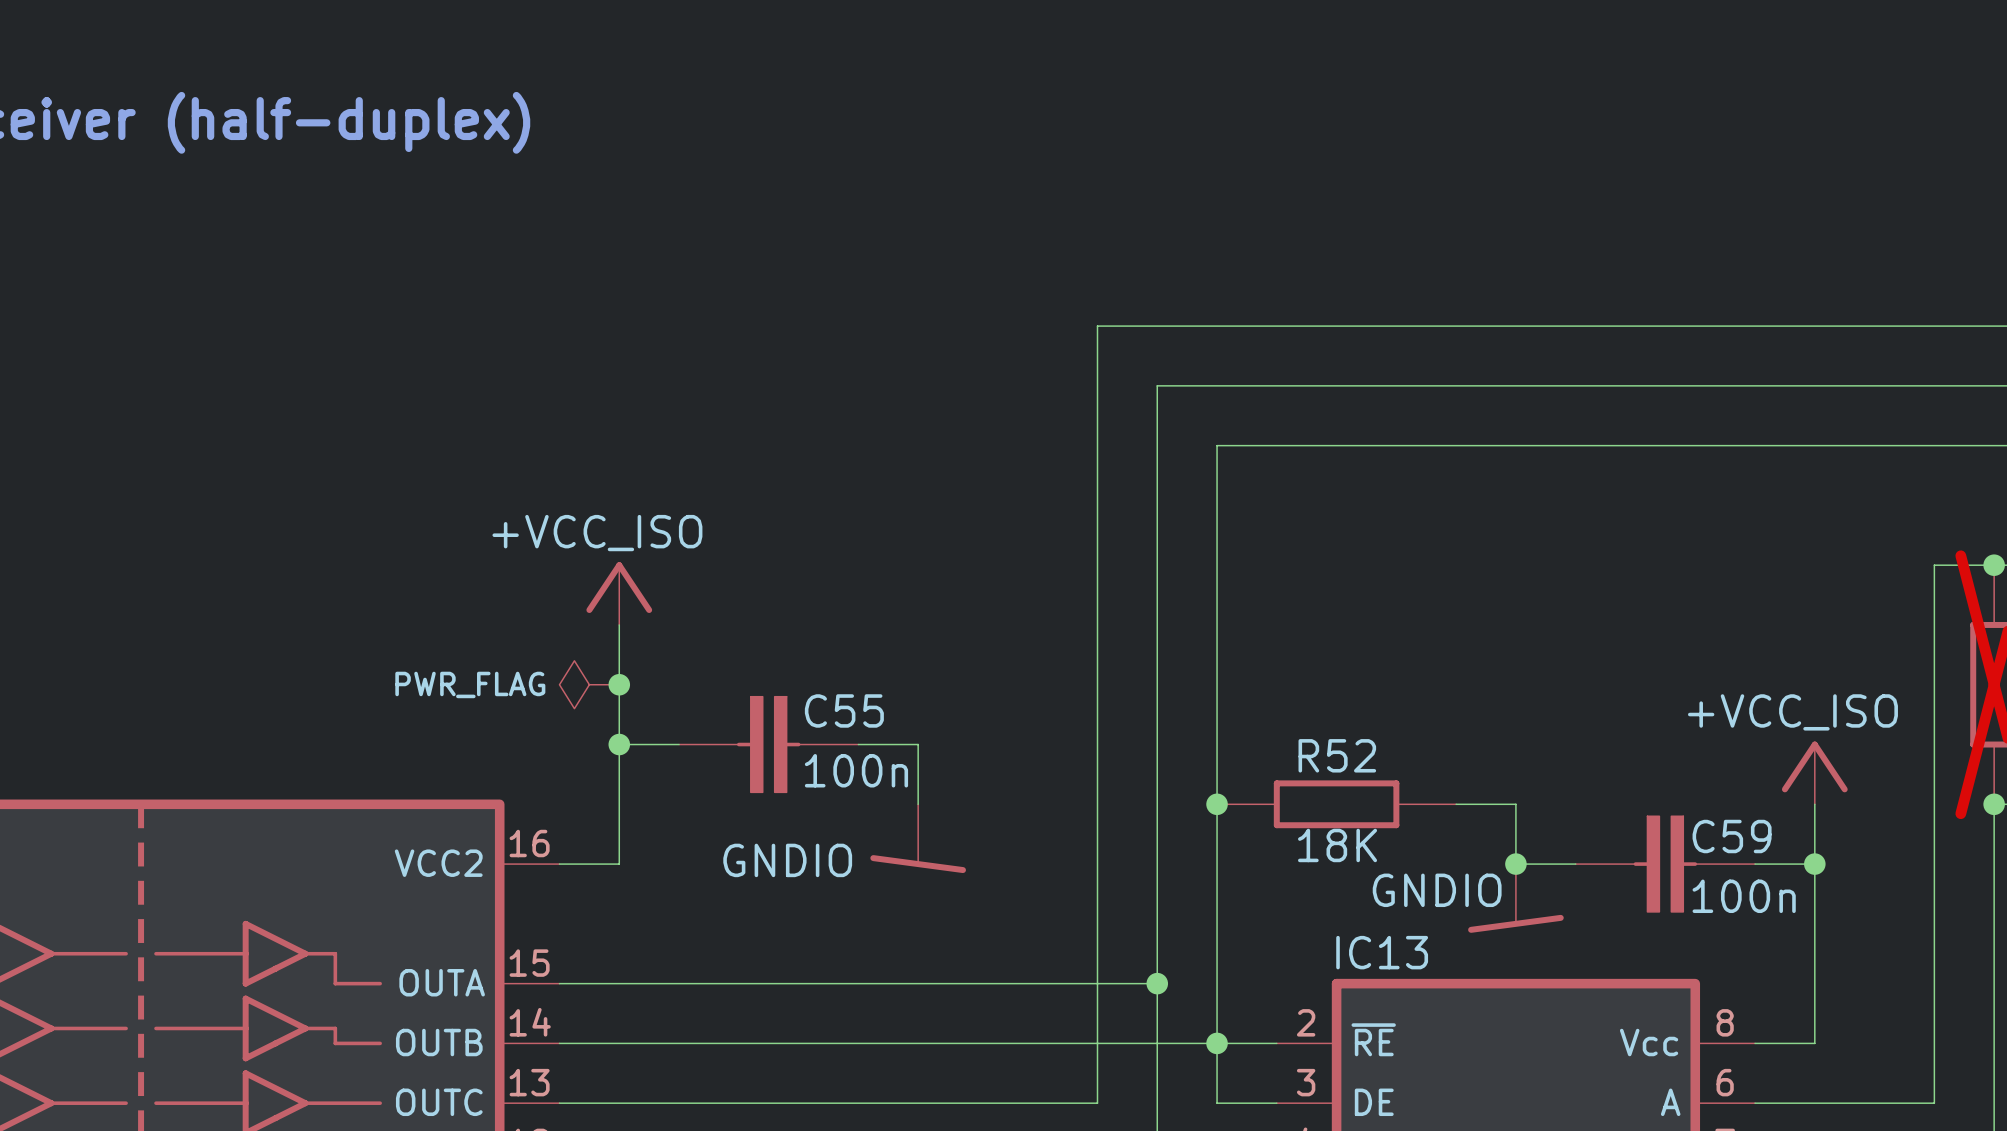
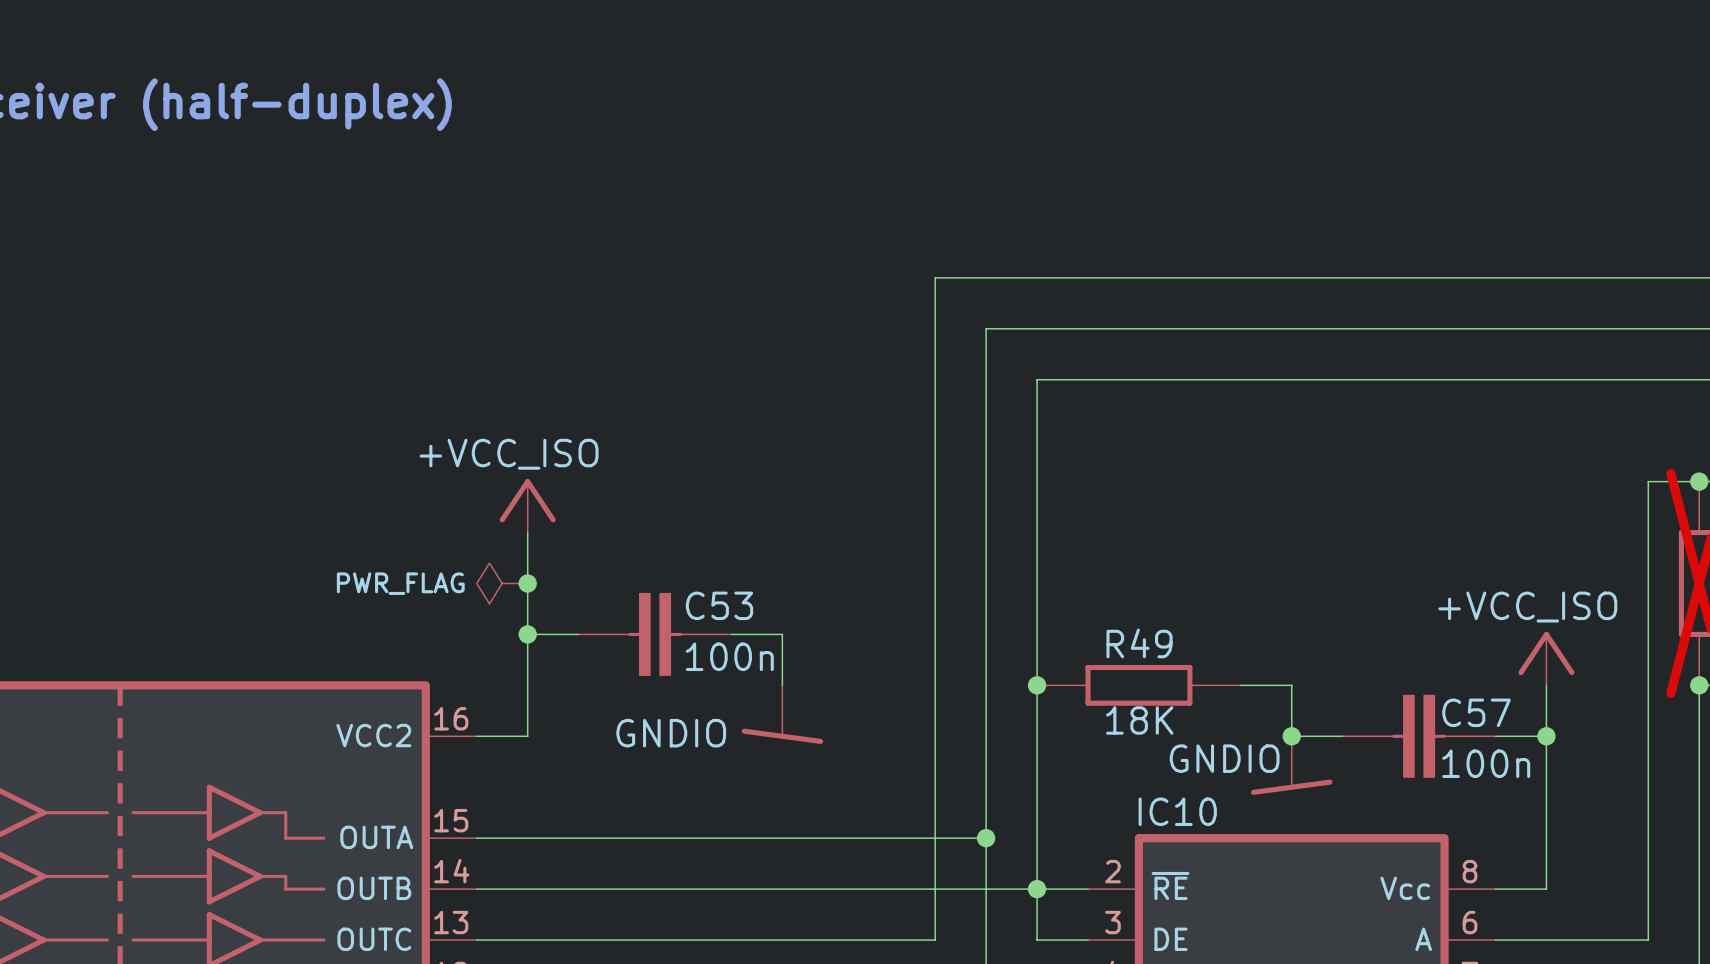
C55 name: C55 (844, 710) -> C53 (719, 605)
R52 name: R52 (1337, 755) -> R49 (1139, 643)
C59 name: C59 (1732, 836) -> C57 (1476, 712)
IC13 name: IC13 (1382, 952) -> IC10 (1177, 811)

